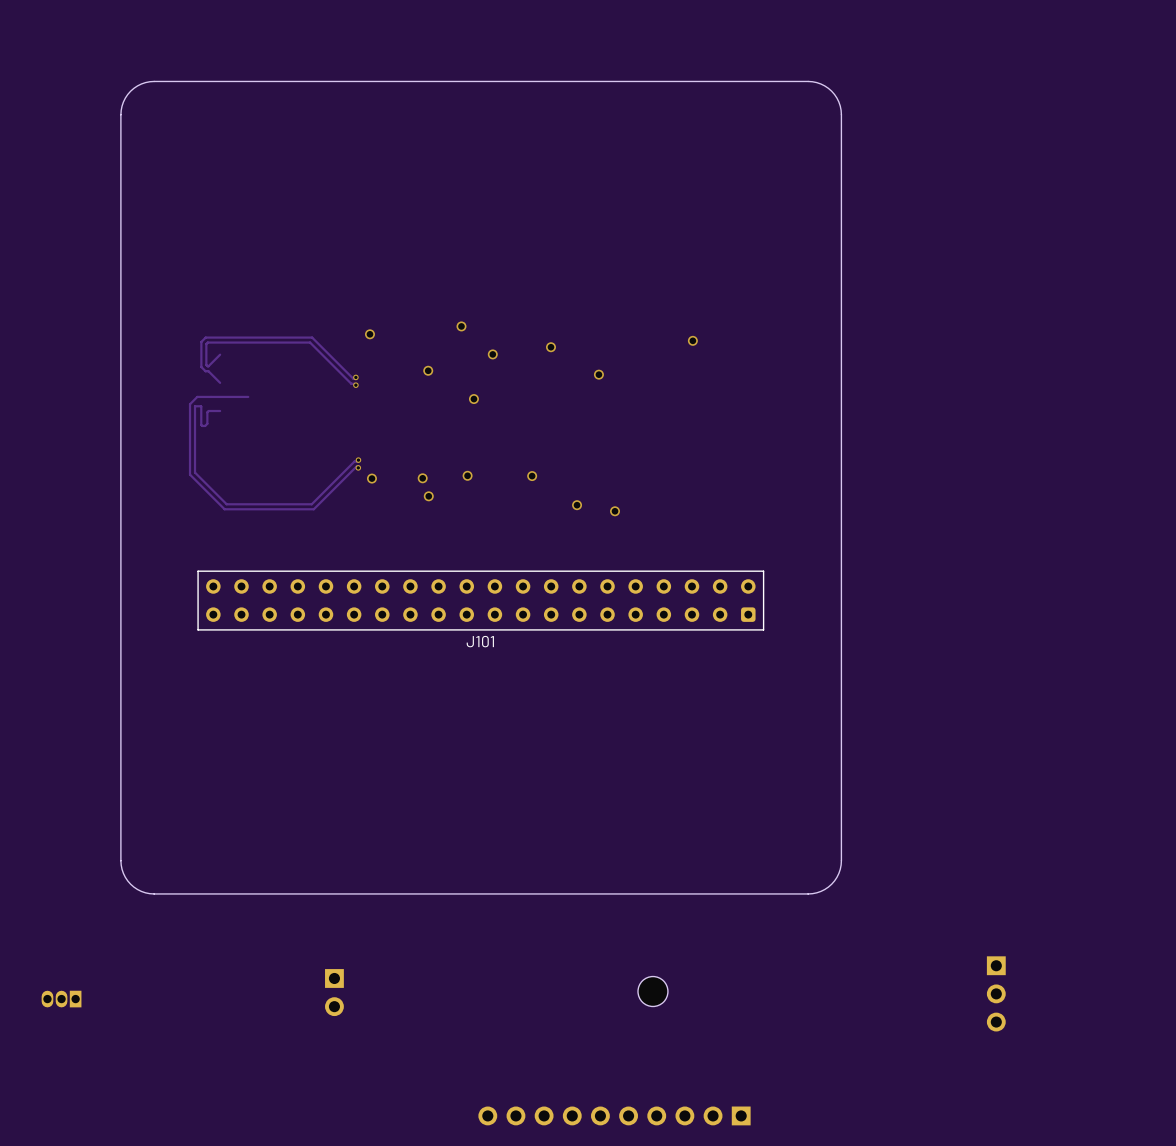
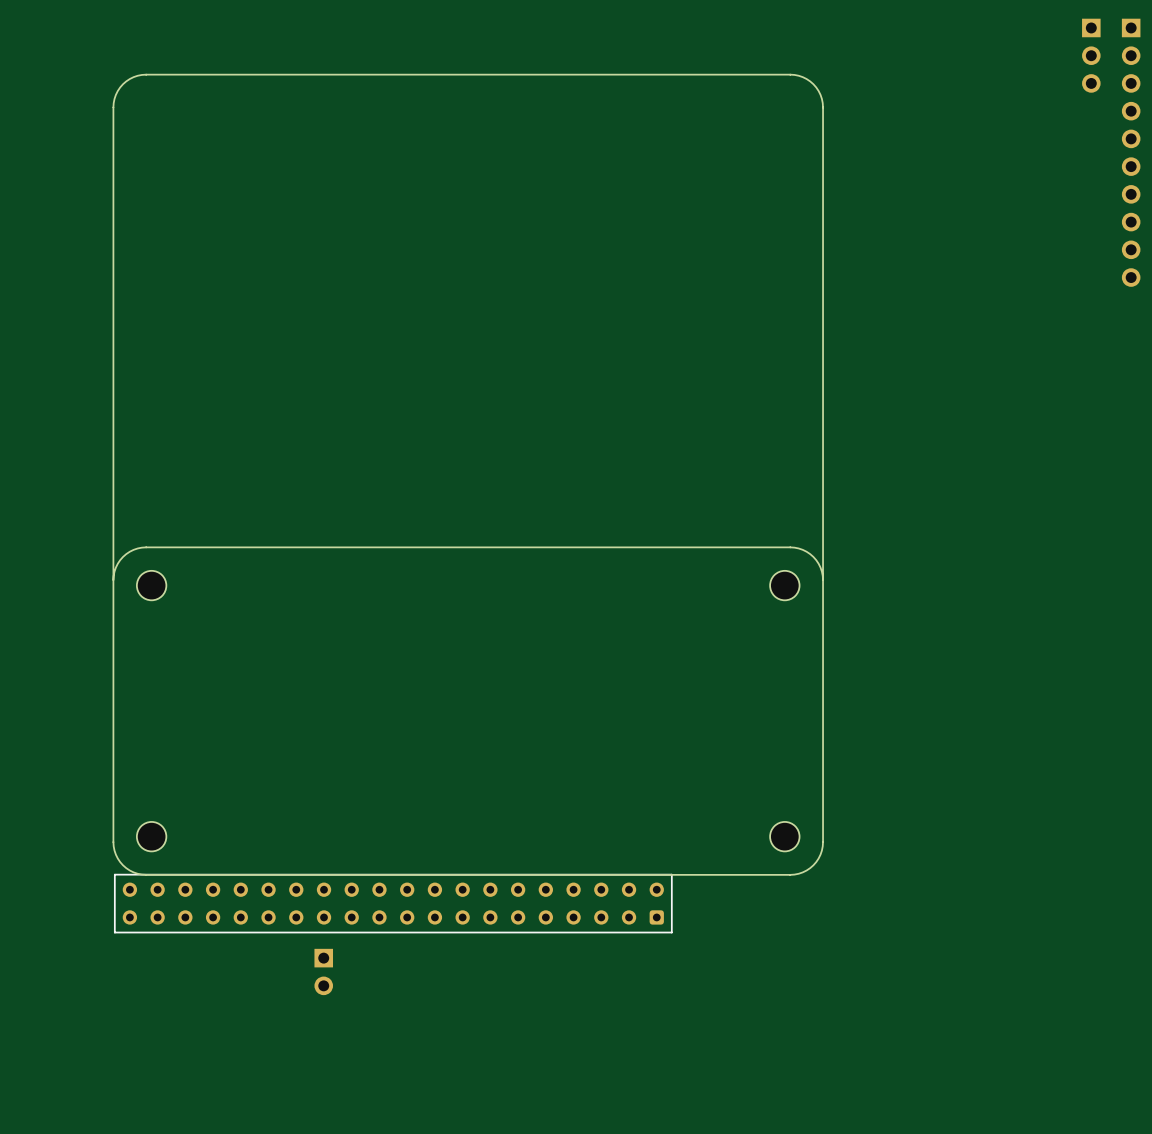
part: none -> (1091, 55)
part: none -> (1131, 152)
via: (461, 326) -> none
via: (369, 334) -> none
via: (692, 340) -> none
via: (550, 347) -> none
track: (220, 354) (207, 366) (206, 344) (310, 342) (351, 383) (355, 385) -> none
via: (492, 354) -> none
via: (428, 370) -> none
via: (598, 374) -> none
track: (355, 377) (353, 378) (312, 337) (205, 337) (201, 341) (201, 367) (220, 382) -> none
via: (355, 377) -> none
via: (355, 385) -> none
track: (248, 396) (197, 396) (190, 404) (190, 474) (224, 509) (313, 509) (356, 466) (358, 467) -> none
via: (473, 399) -> none
track: (220, 411) (208, 411) (207, 423) (202, 425) (201, 406) (195, 406) (195, 472) (226, 504) (311, 504) (354, 461) (358, 460) -> none
via: (358, 460) -> none
via: (358, 467) -> none
via: (467, 475) -> none
via: (532, 476) -> none
via: (371, 478) -> none
via: (422, 478) -> none
via: (428, 496) -> none
via: (577, 505) -> none
via: (615, 511) -> none
board edge: none -> (823, 580) (820, 567) (813, 556) (802, 549) (790, 547) (146, 547) (133, 549) (123, 556) (115, 567) (113, 580)
part: none -> (151, 585)
J101: (480, 600) -> none
part: none -> (784, 585)
part: none -> (151, 836)
part: none -> (393, 903)
part position: (652, 991) -> (784, 836)
part: (996, 993) -> none
part: (61, 999) -> none
part: (614, 1115) -> none

